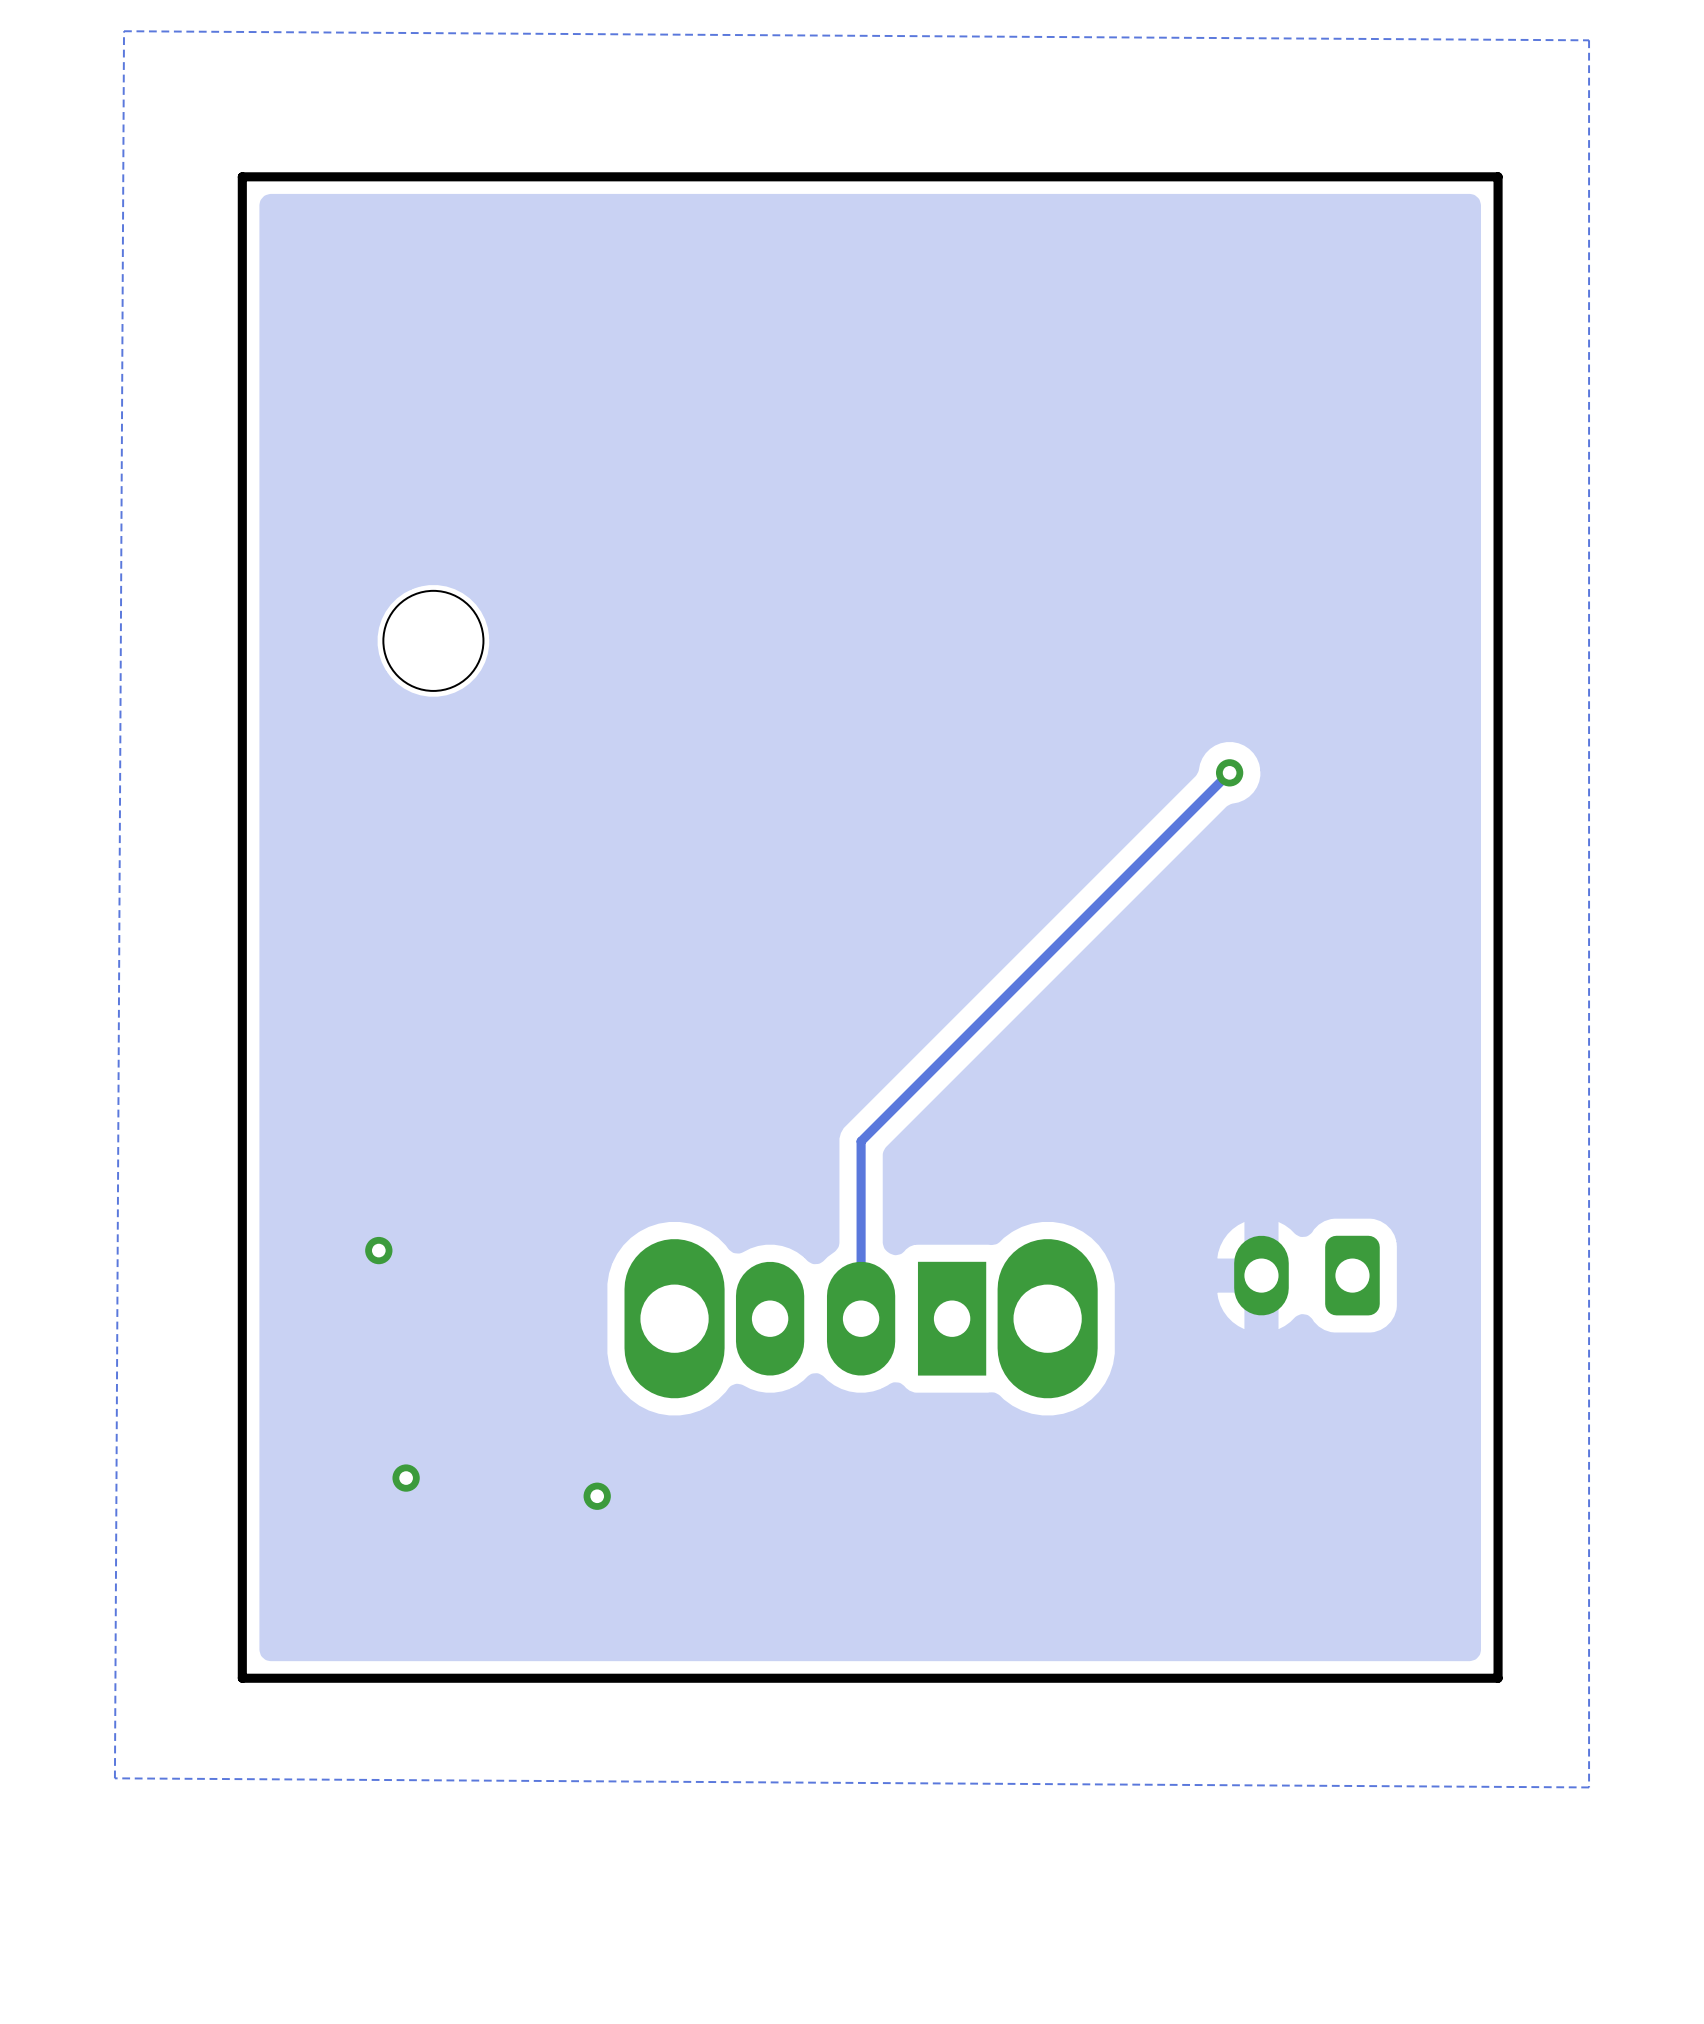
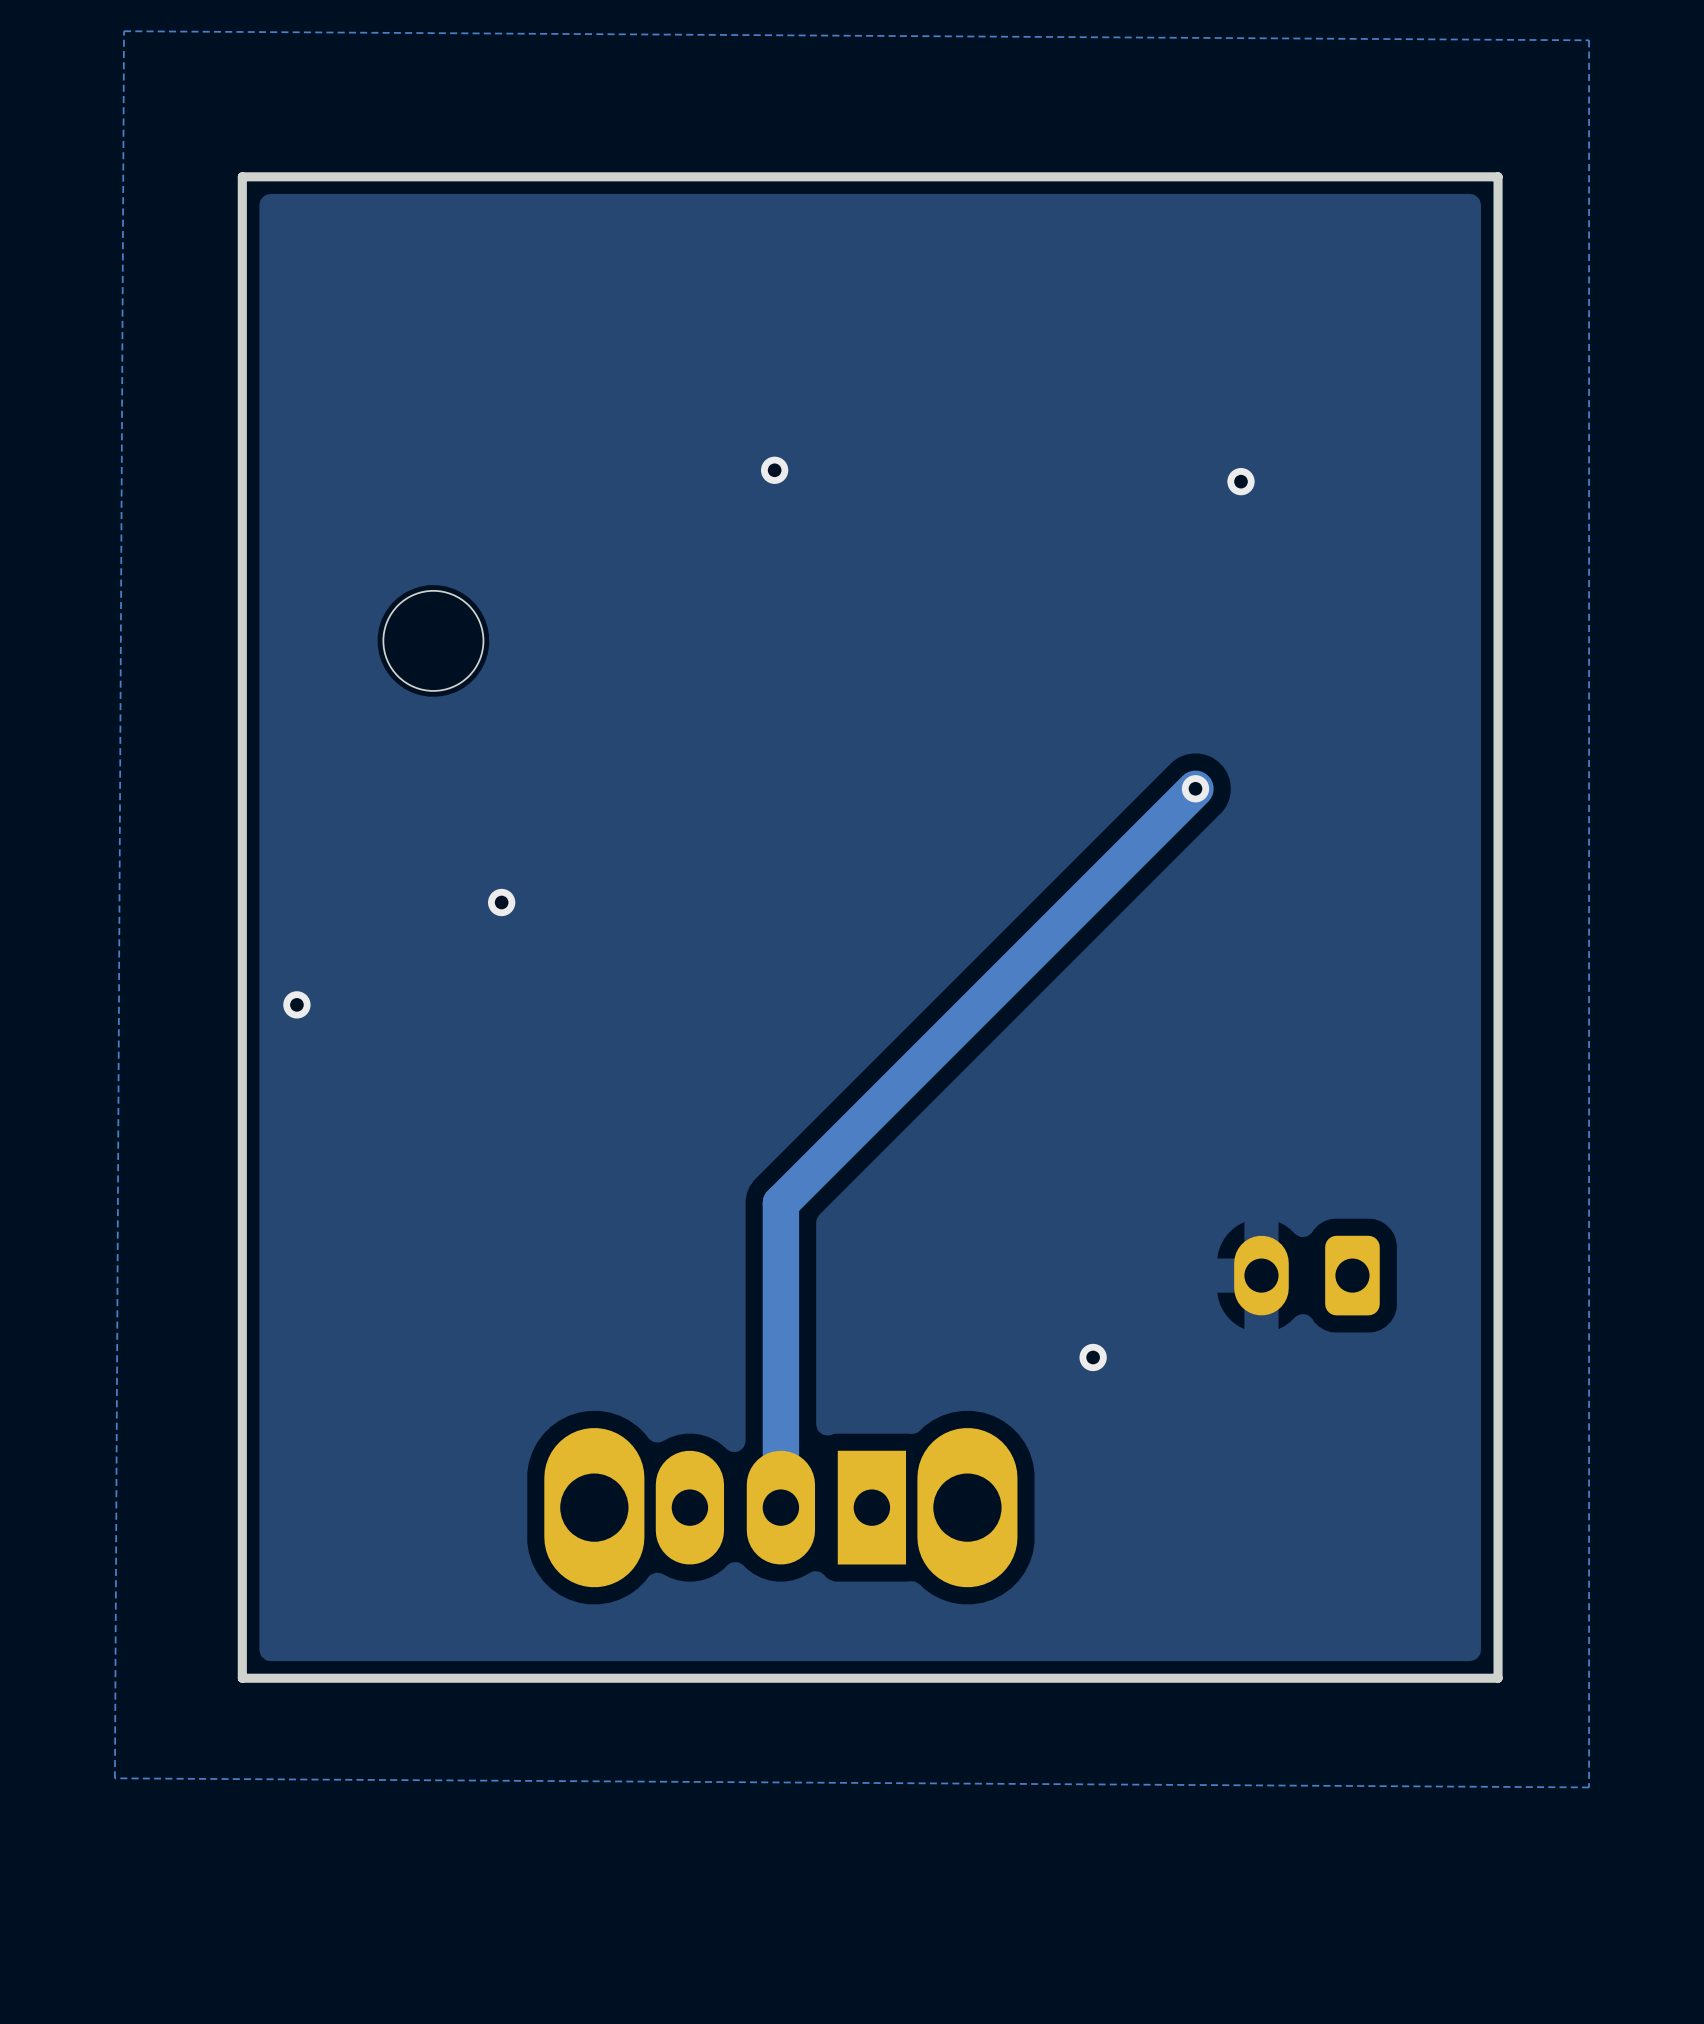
via: none -> (774, 470)
via: none -> (1241, 481)
track: (1234, 768) (861, 1141) (861, 1318) -> none
via position: (1229, 772) -> (1195, 788)
track: none -> (1195, 788) (780, 1203) (780, 1507)
via: none -> (501, 902)
via: none -> (296, 1004)
via: (378, 1250) -> none
part position: (861, 1318) -> (780, 1507)
via: none -> (1093, 1357)
via: (406, 1478) -> none
via: (597, 1496) -> none

